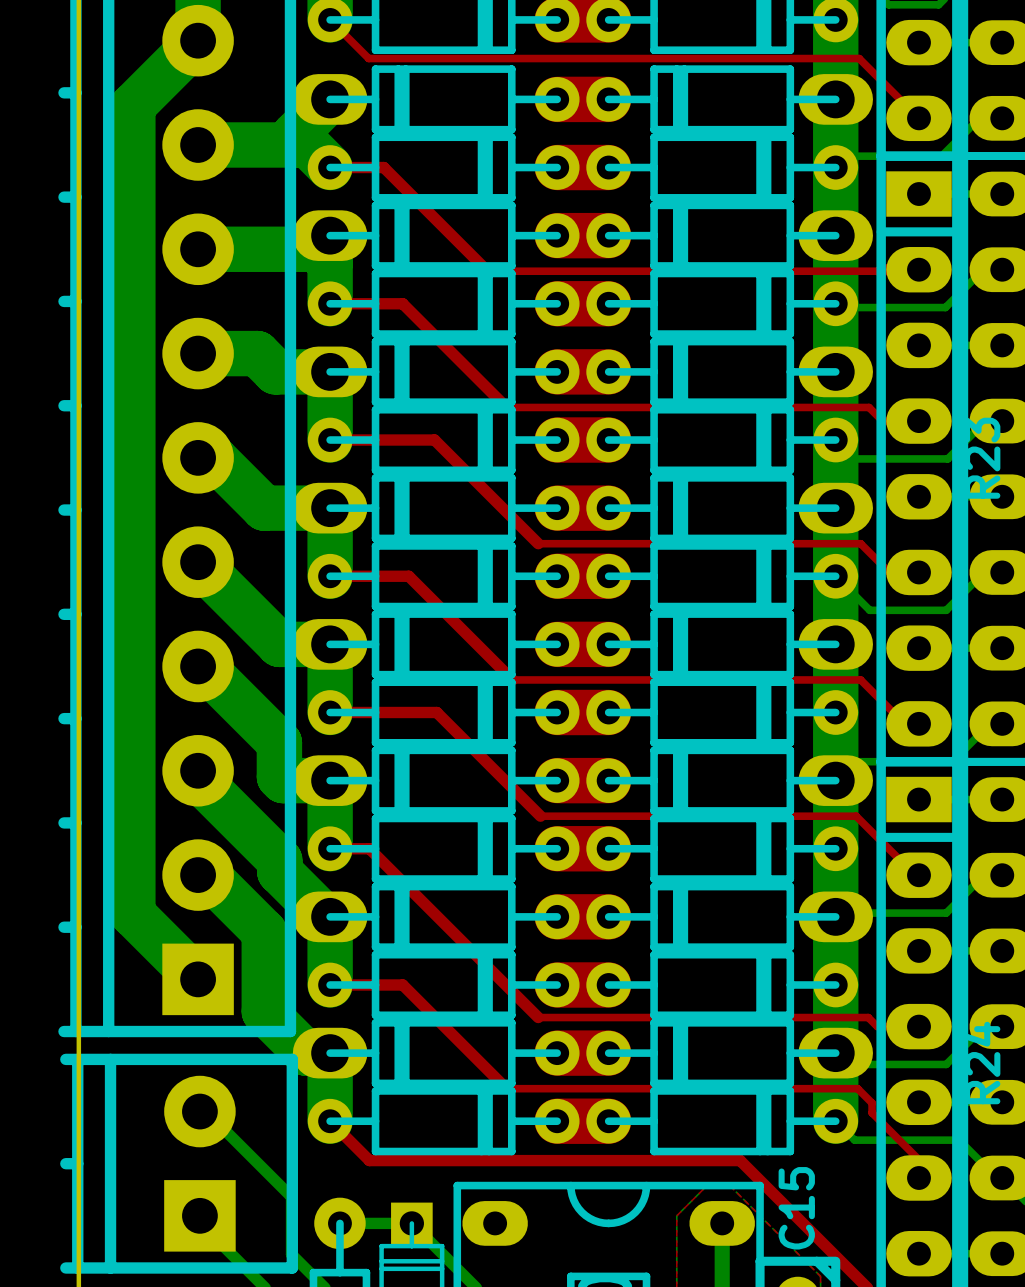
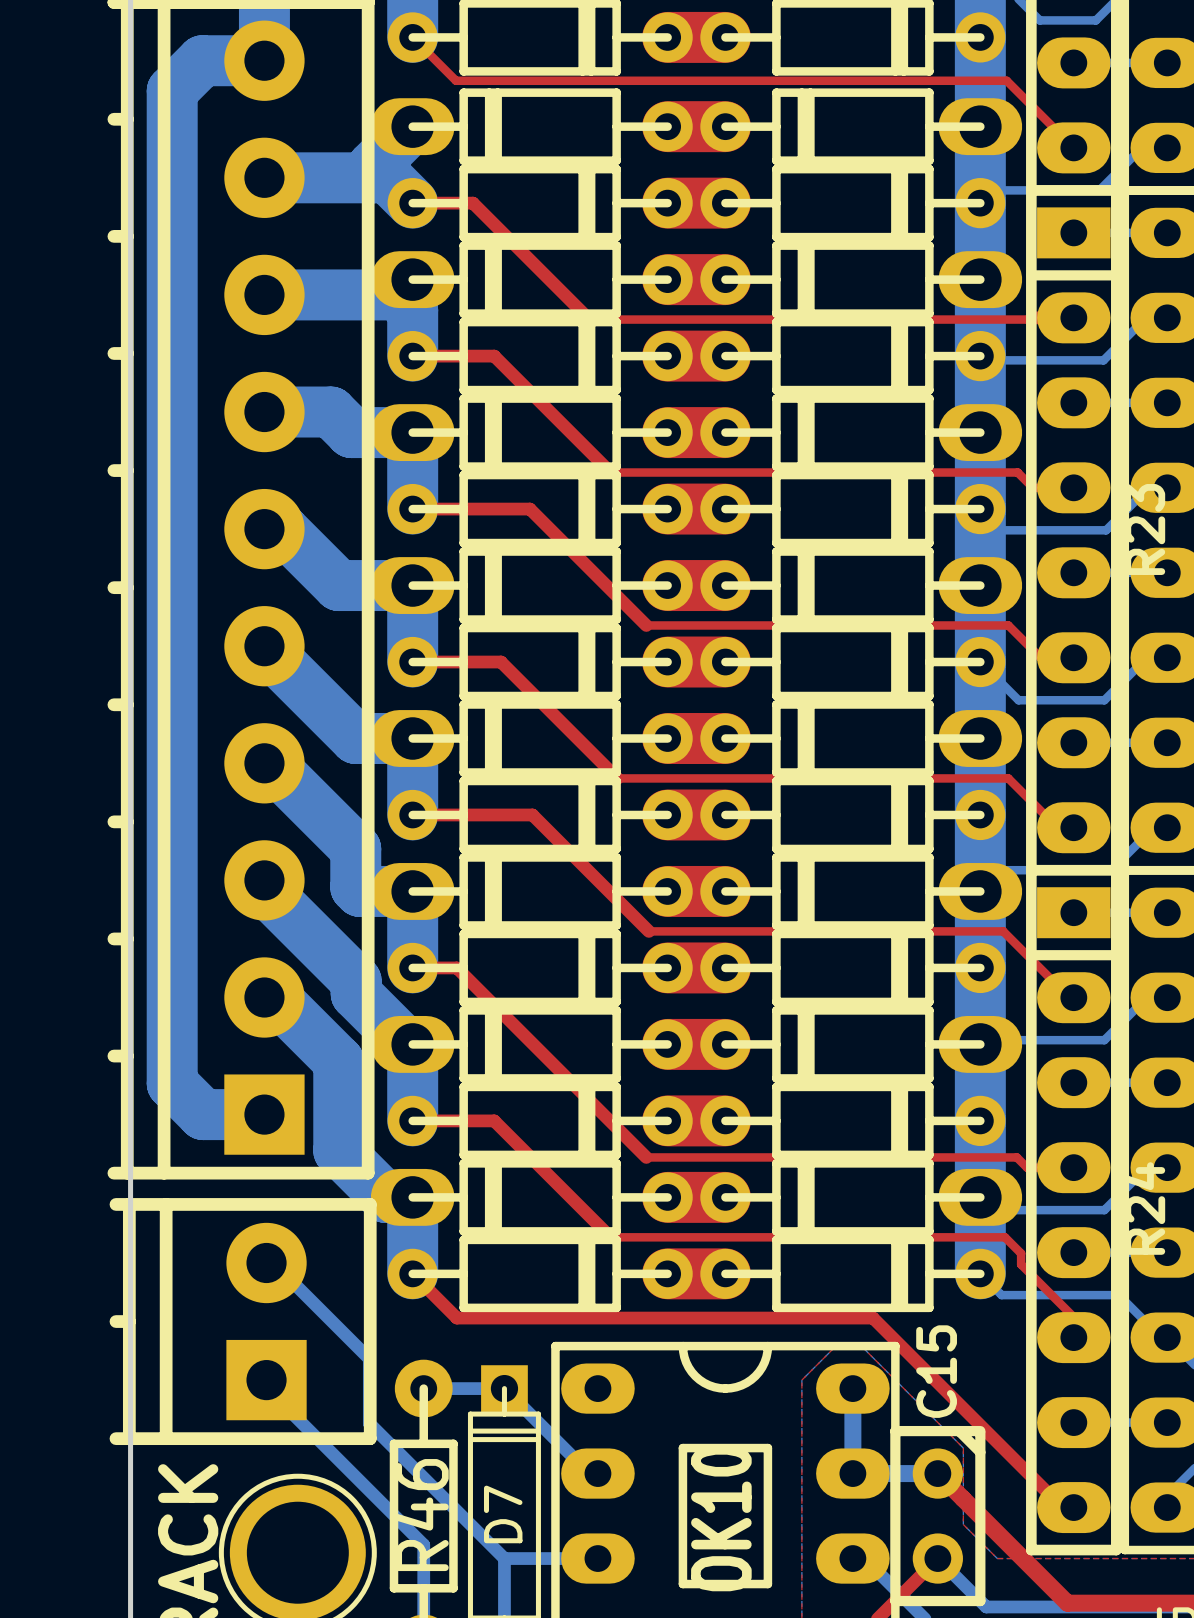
bottom track: (198, 40) (132, 105) (132, 914) (198, 979) -> (264, 60) (202, 60) (172, 90) (172, 1083) (203, 1114) (264, 1114)

